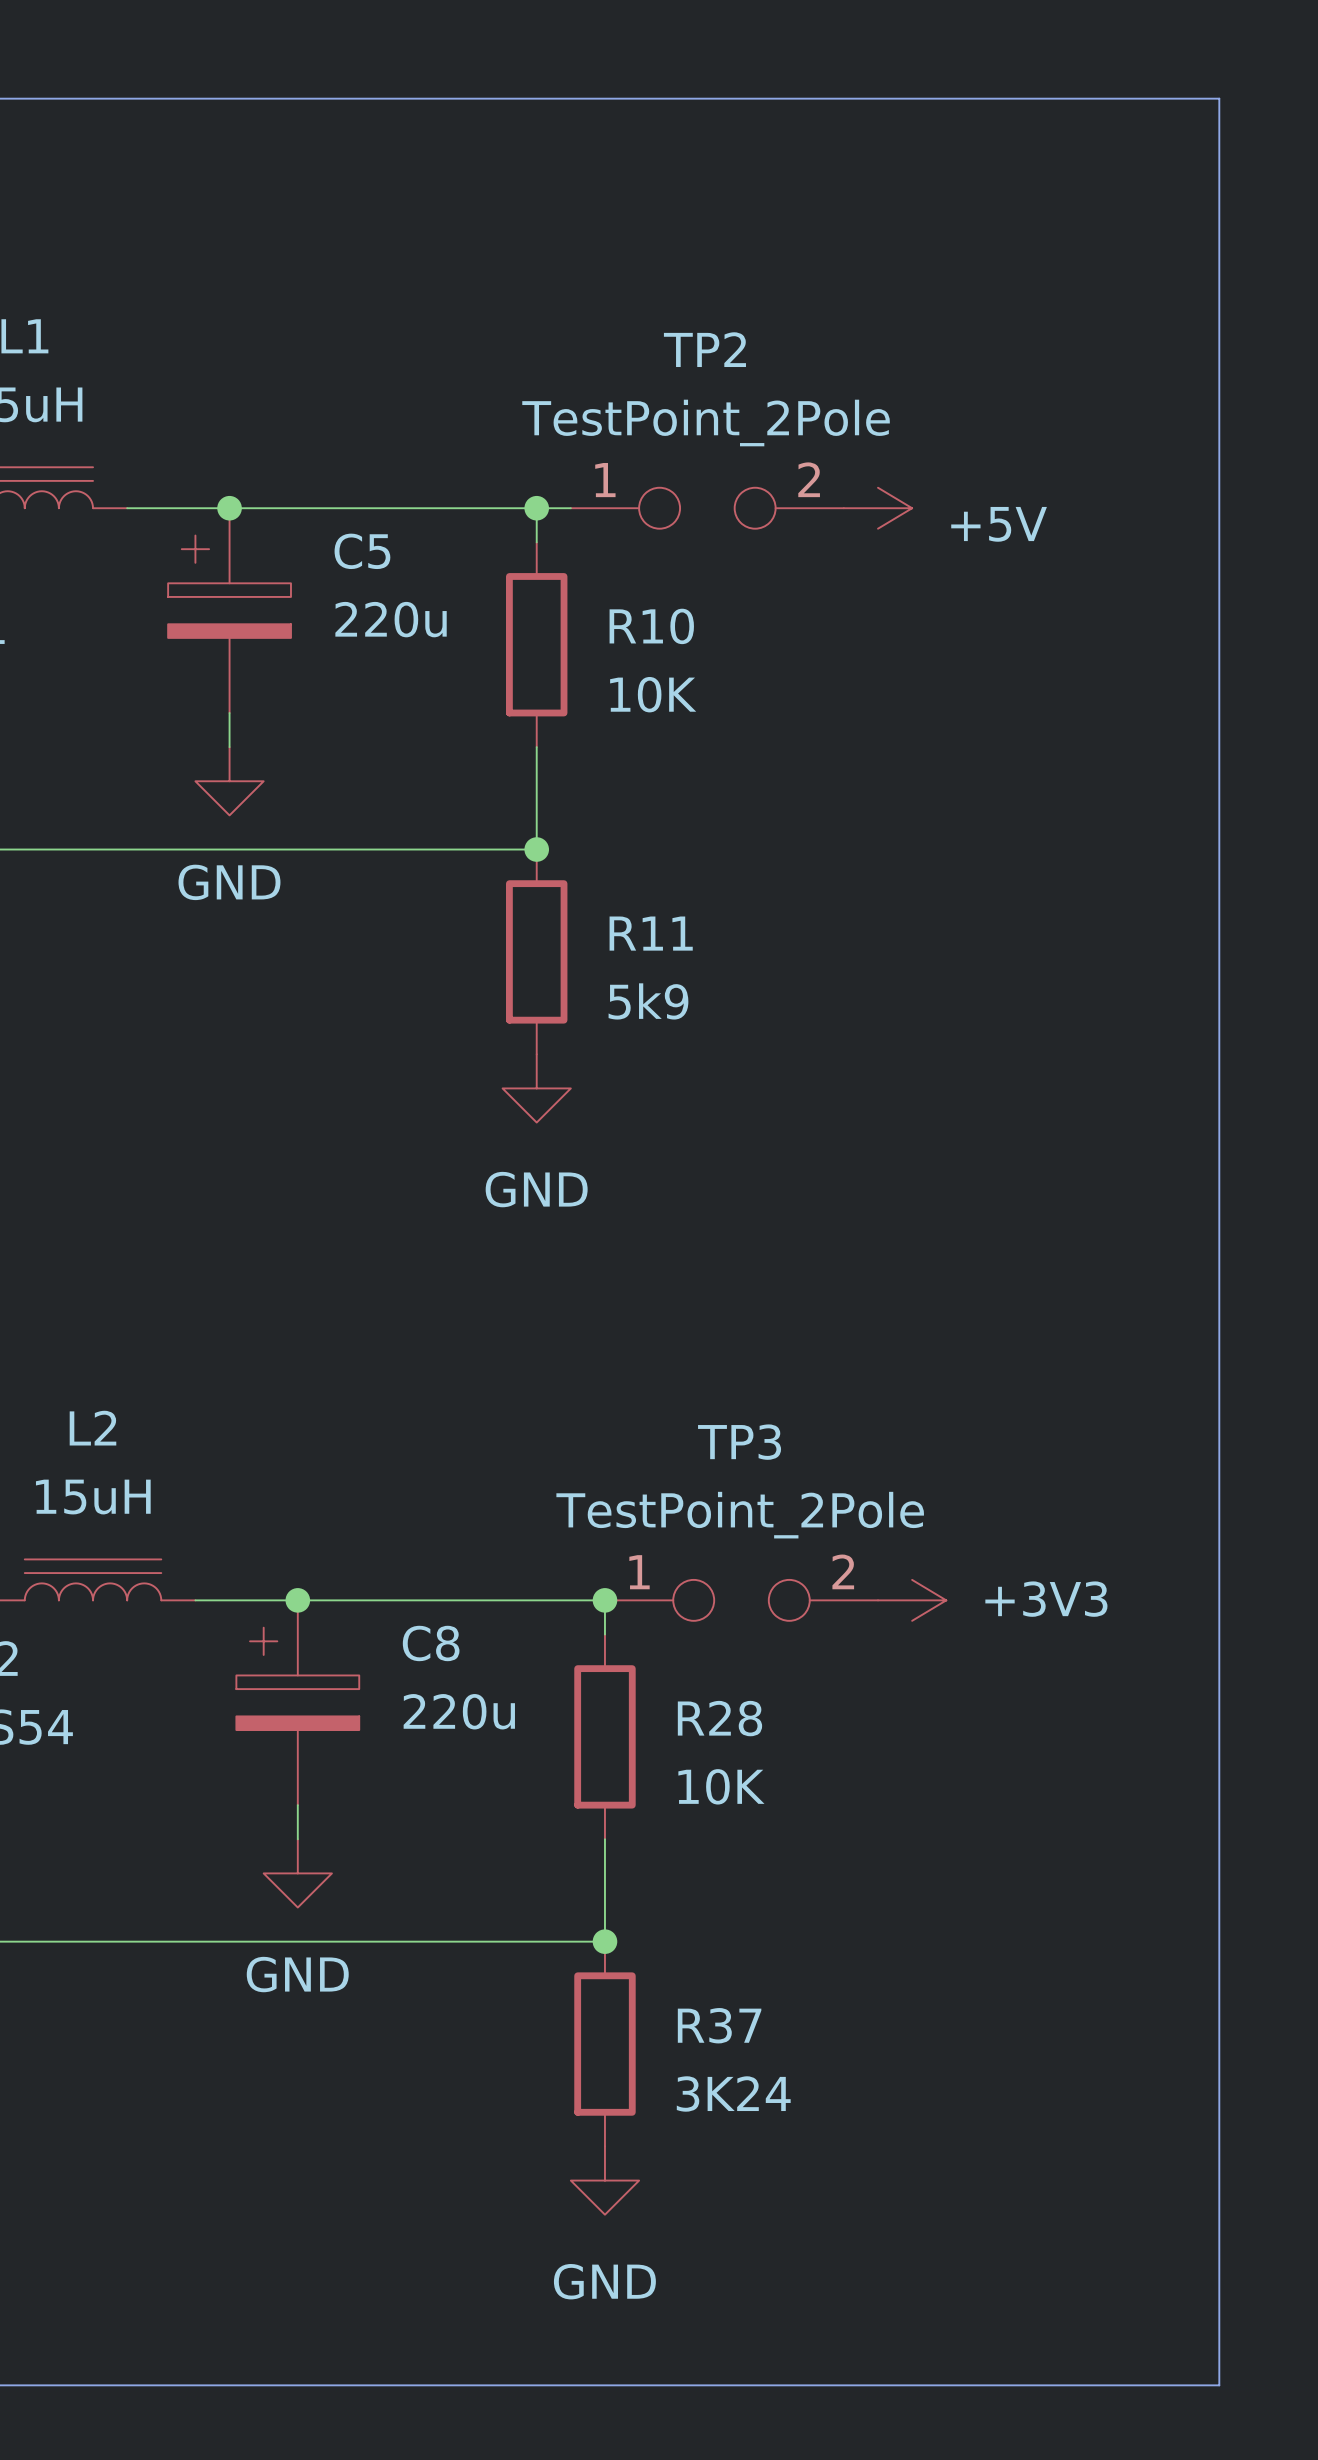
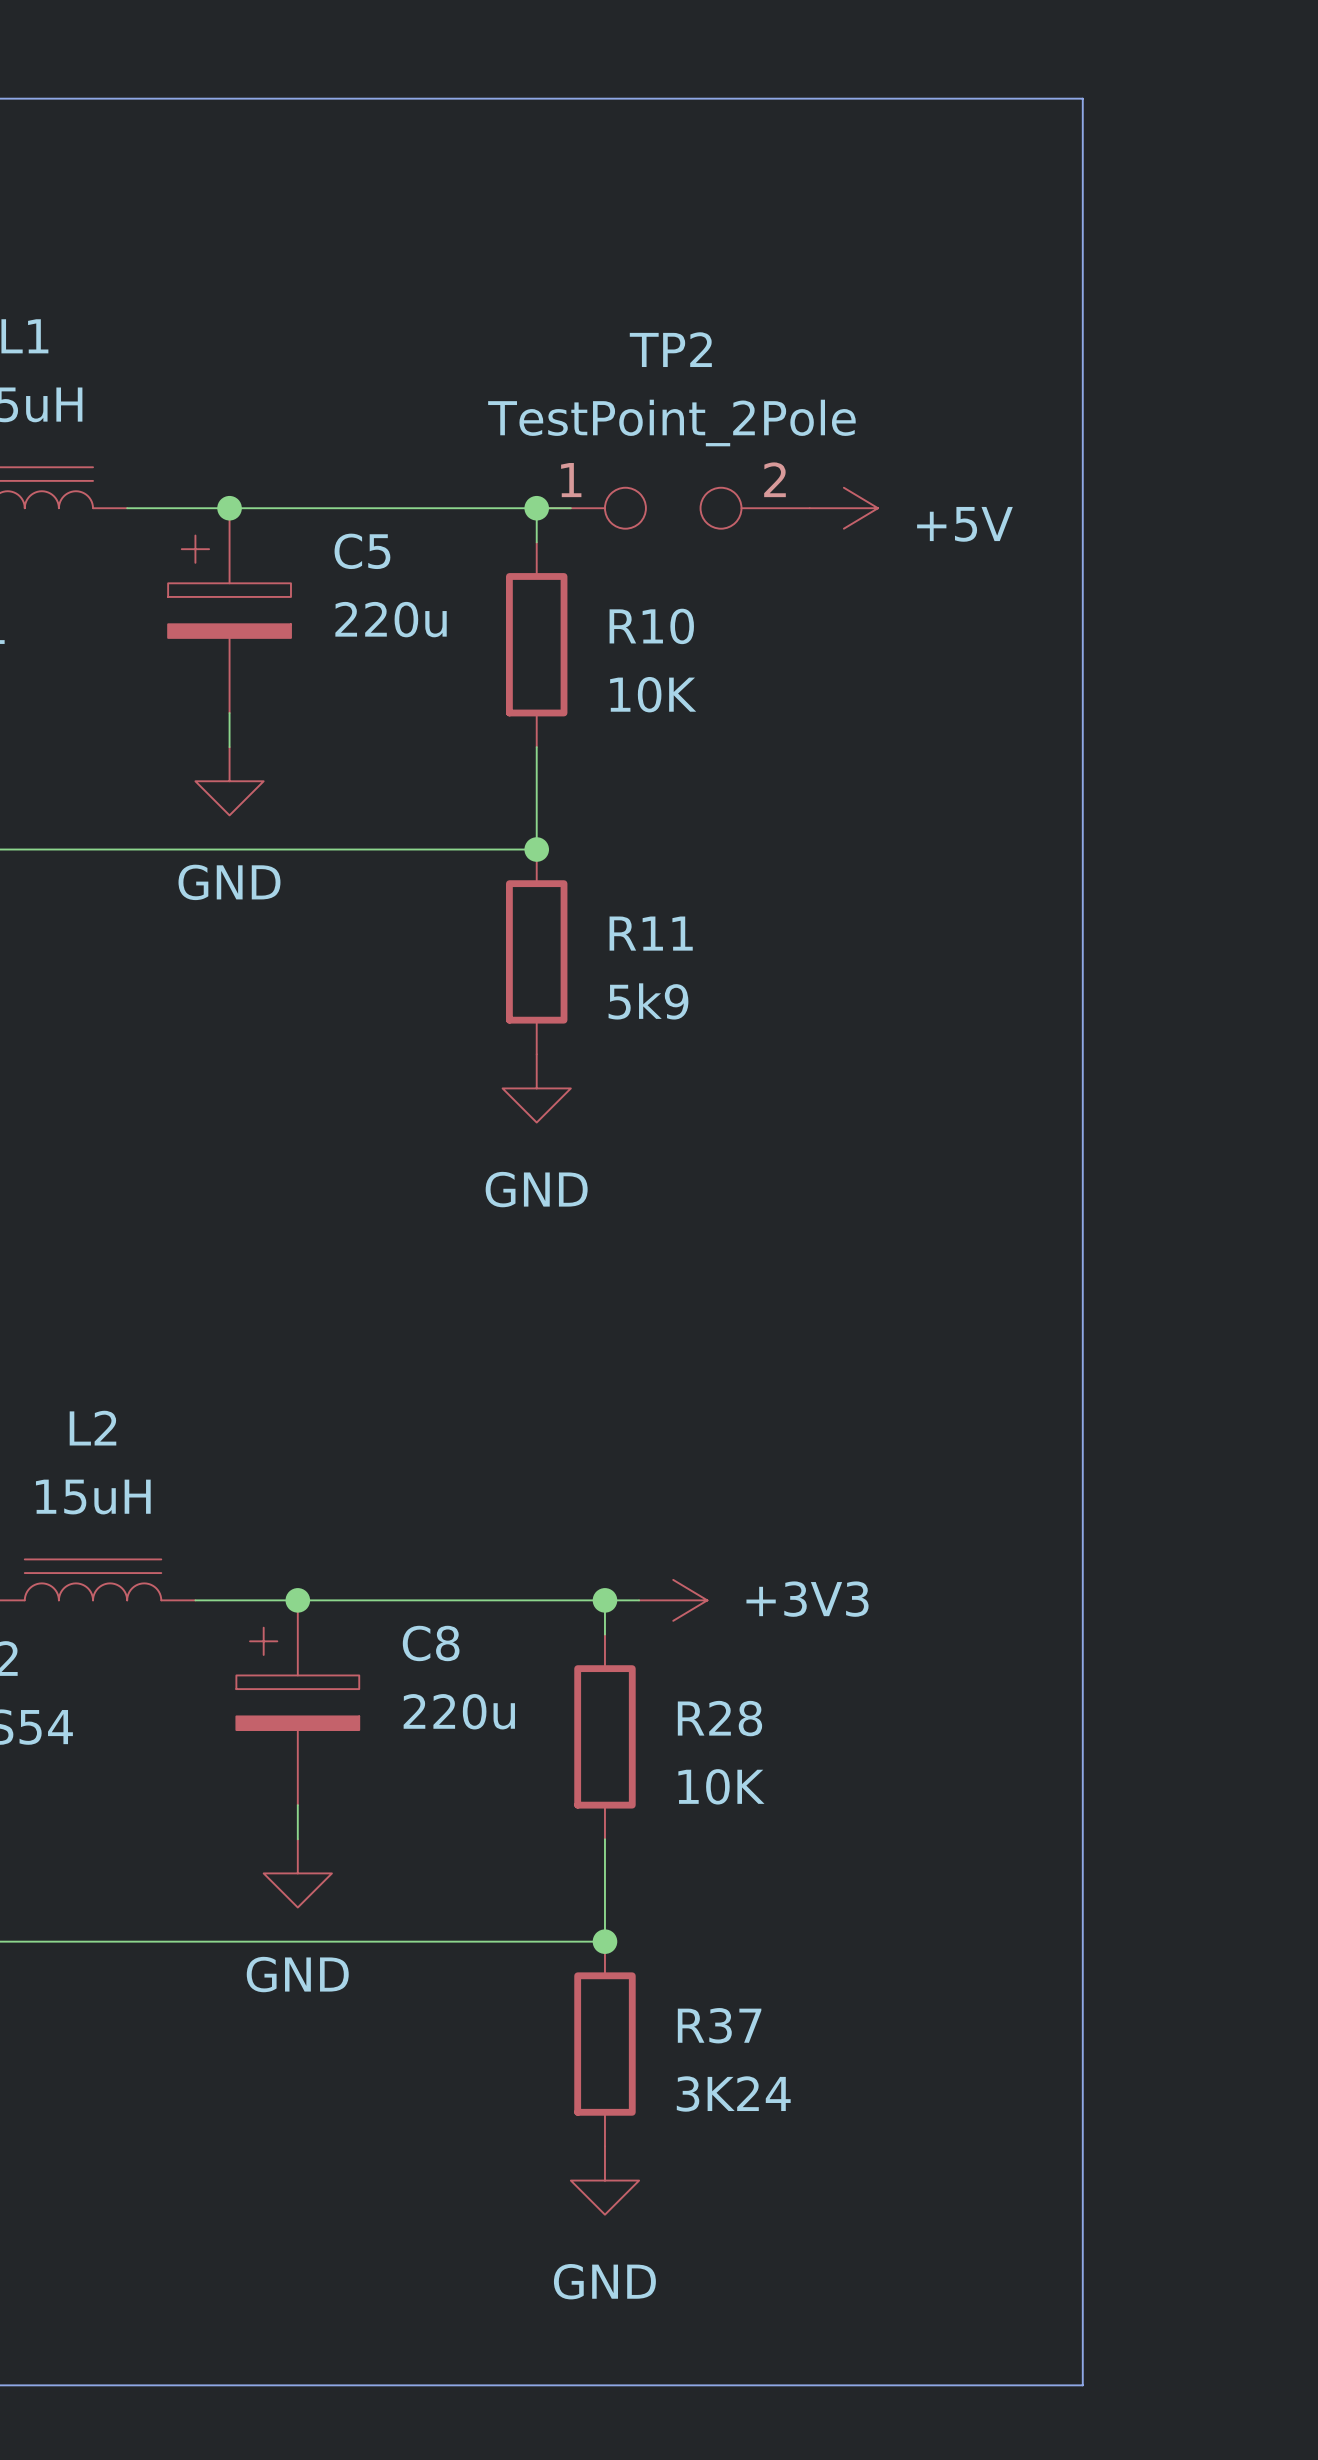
line: (1082, 98) (1219, 98) (1219, 2385) (1082, 2385) -> (1082, 98) (1082, 2385)
TP2 position: (707, 508) -> (673, 508)
power symbol position: +5V (878, 508) -> +5V (843, 508)
TP3: TestPoint_2Pole (741, 1600) -> none
power symbol position: +3V3 (912, 1600) -> +3V3 (673, 1600)

